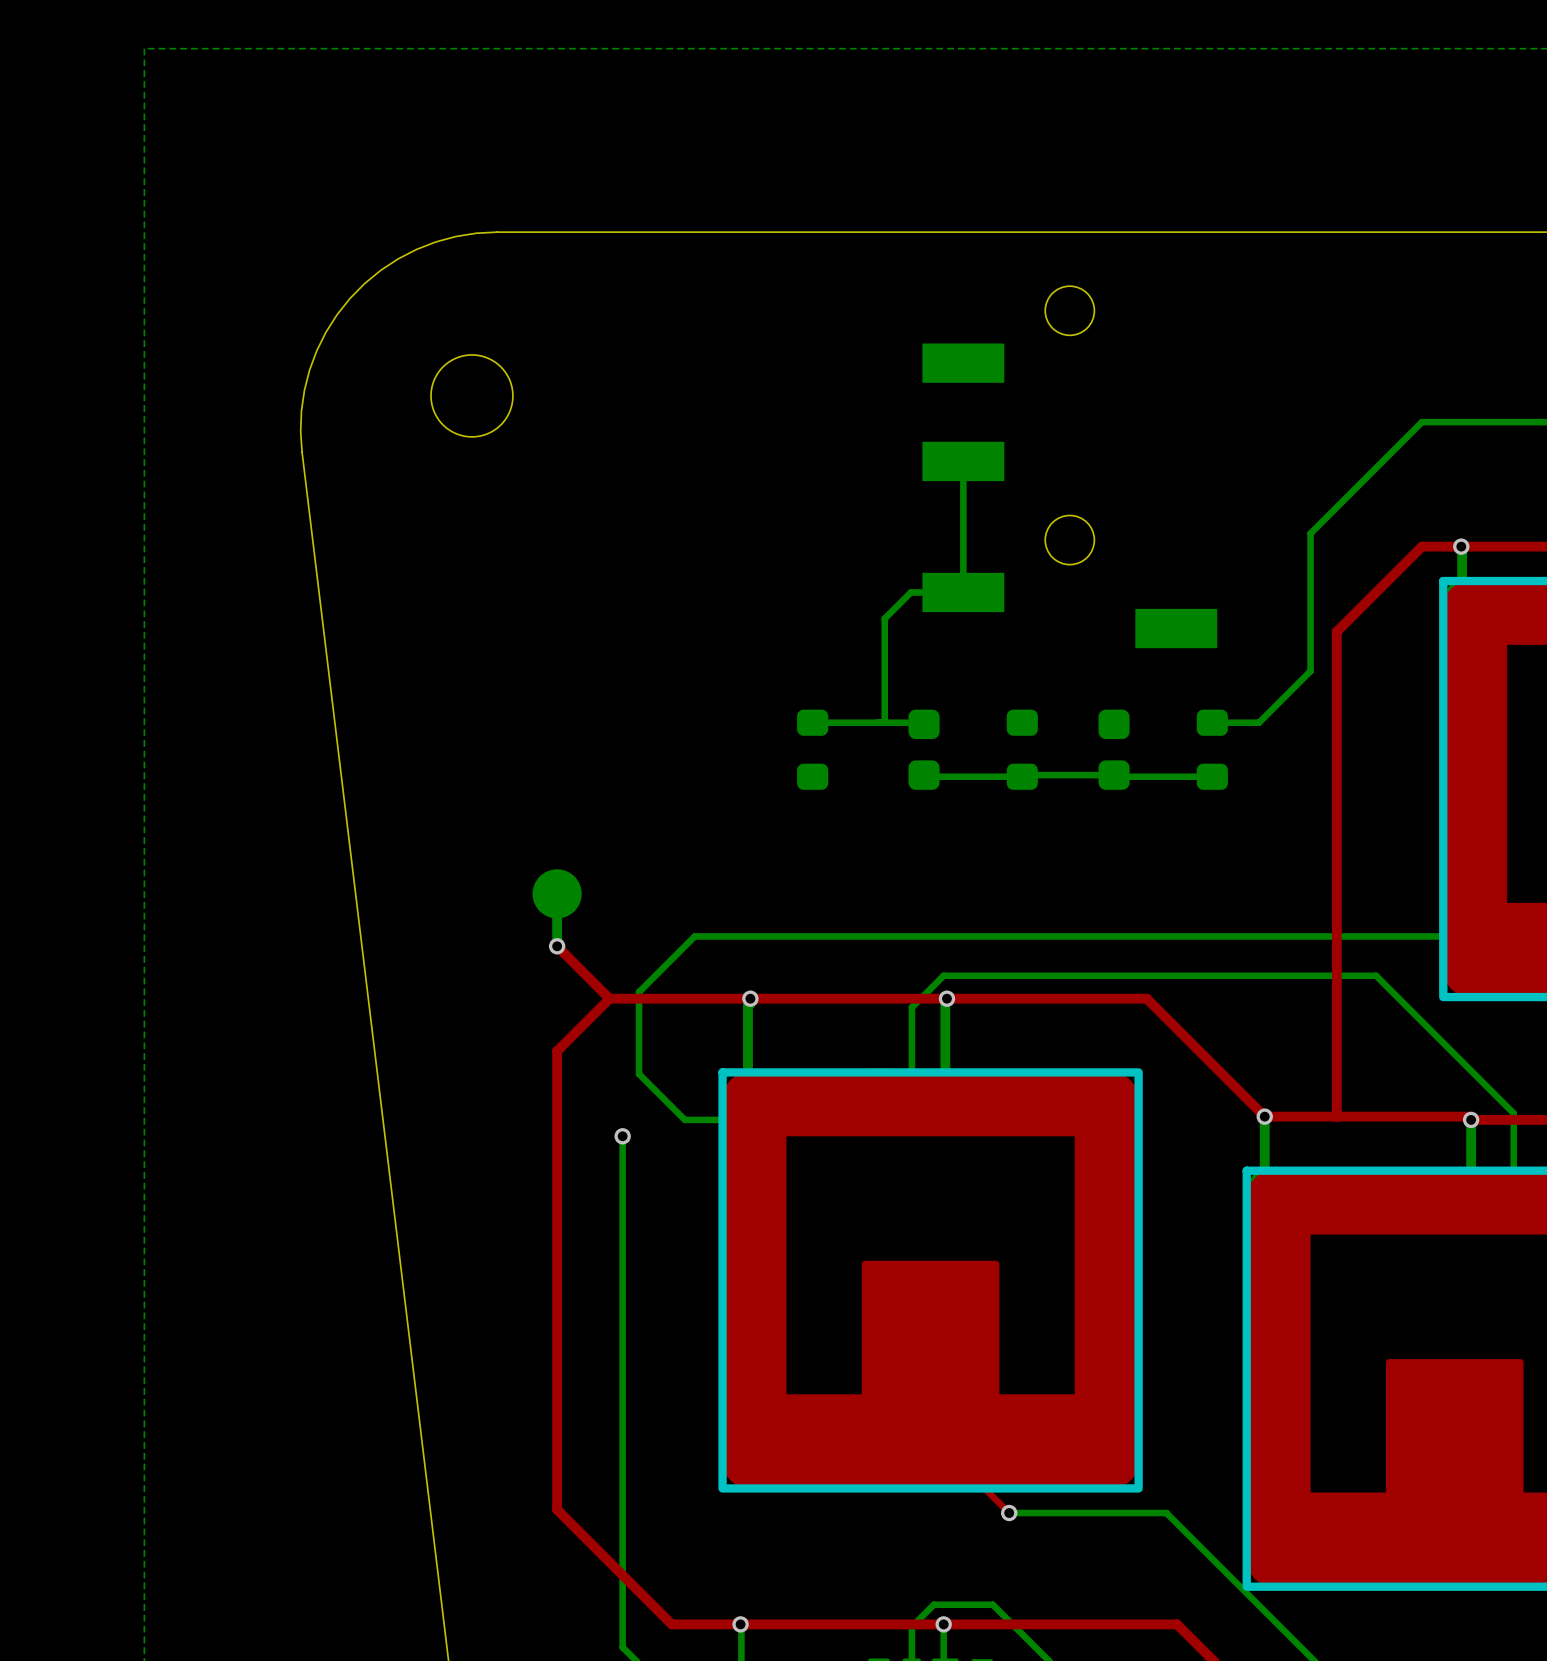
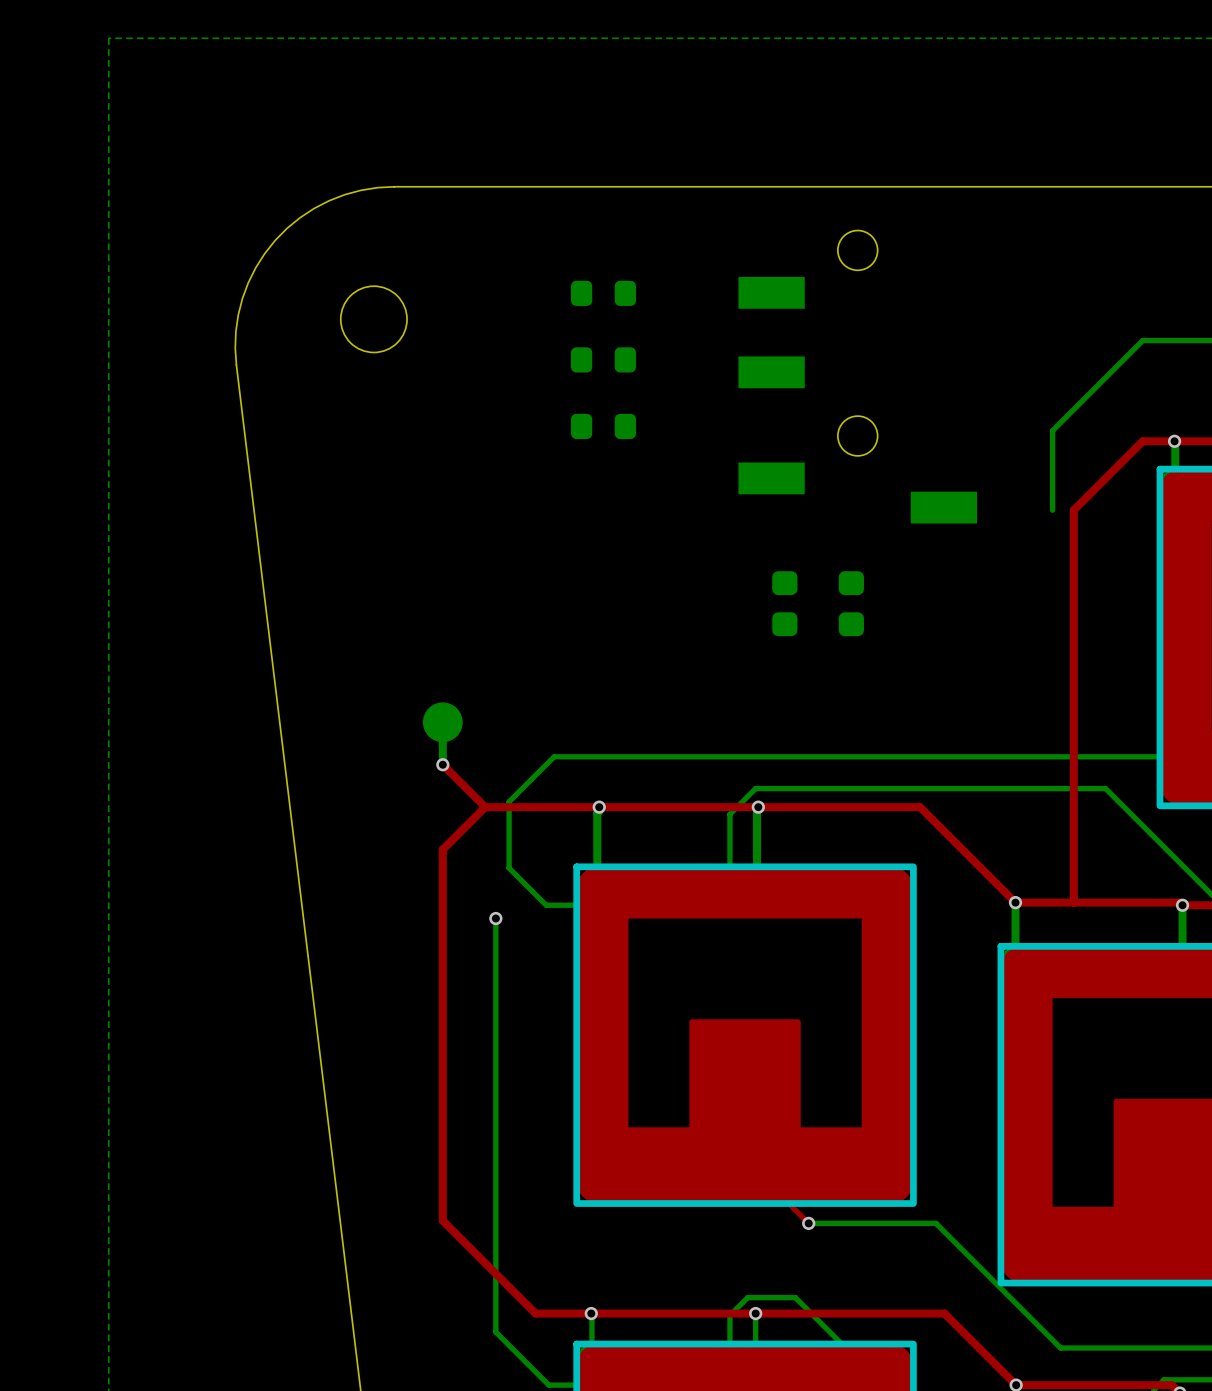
part: none -> (603, 293)
part: none -> (603, 359)
bottom track: (963, 461) (963, 592) (910, 592) (884, 618) (884, 722) -> none
part: none -> (603, 426)
bottom track: (1310, 631) (1310, 671) (1259, 722) (1212, 722) -> none
bottom track: (812, 722) (922, 722) (924, 724) -> none
part: (812, 749) -> none
part position: (924, 749) -> (784, 603)
part: (1022, 749) -> none
part position: (1114, 749) -> (851, 603)
part: (1212, 749) -> none
bottom track: (924, 775) (925, 776) (1022, 776) (1023, 775) (1212, 776) -> none

